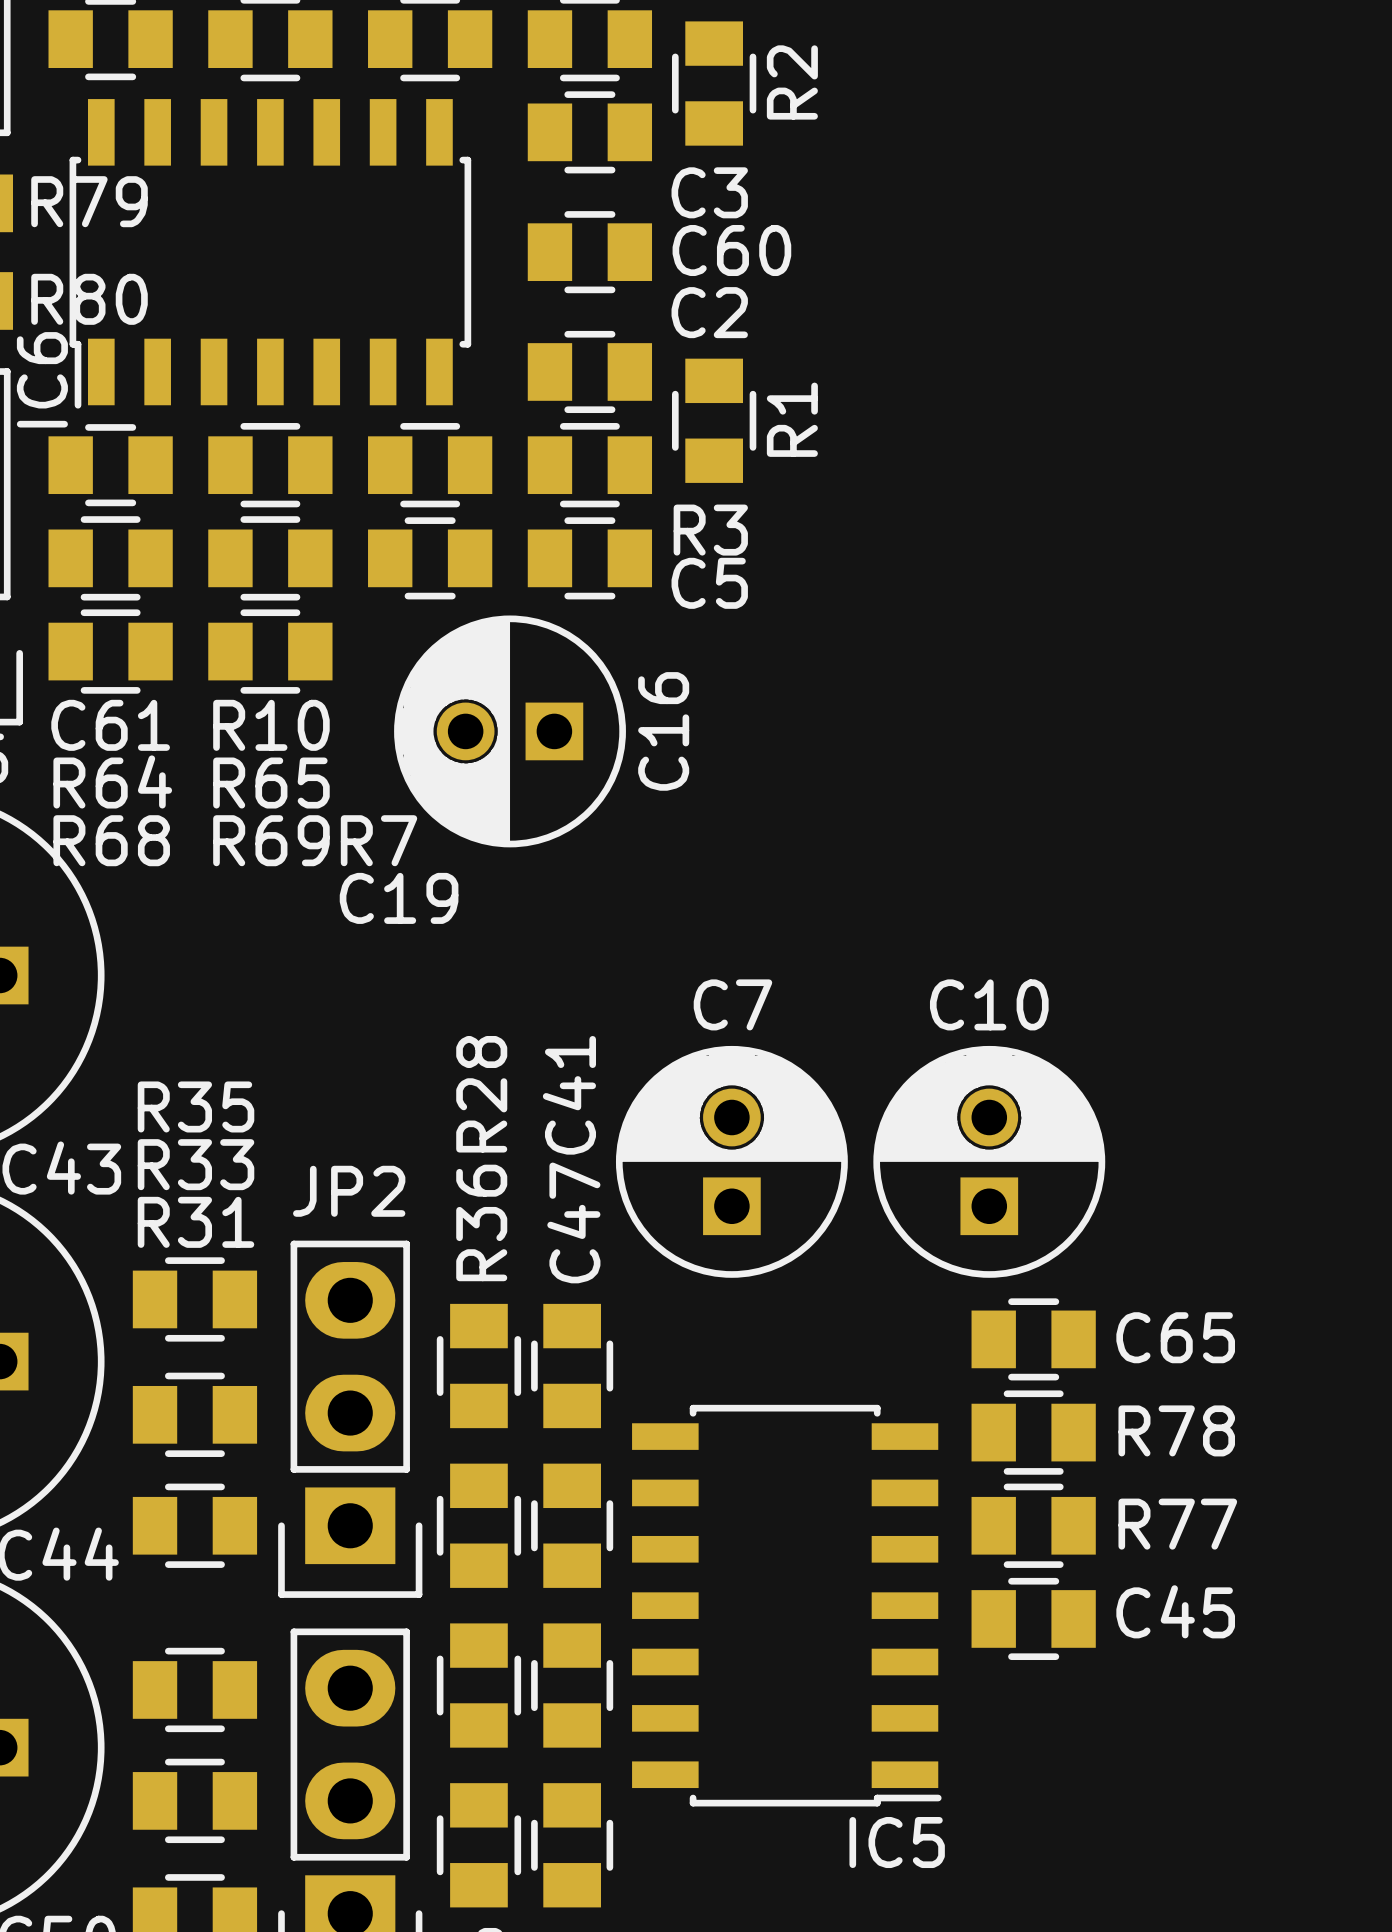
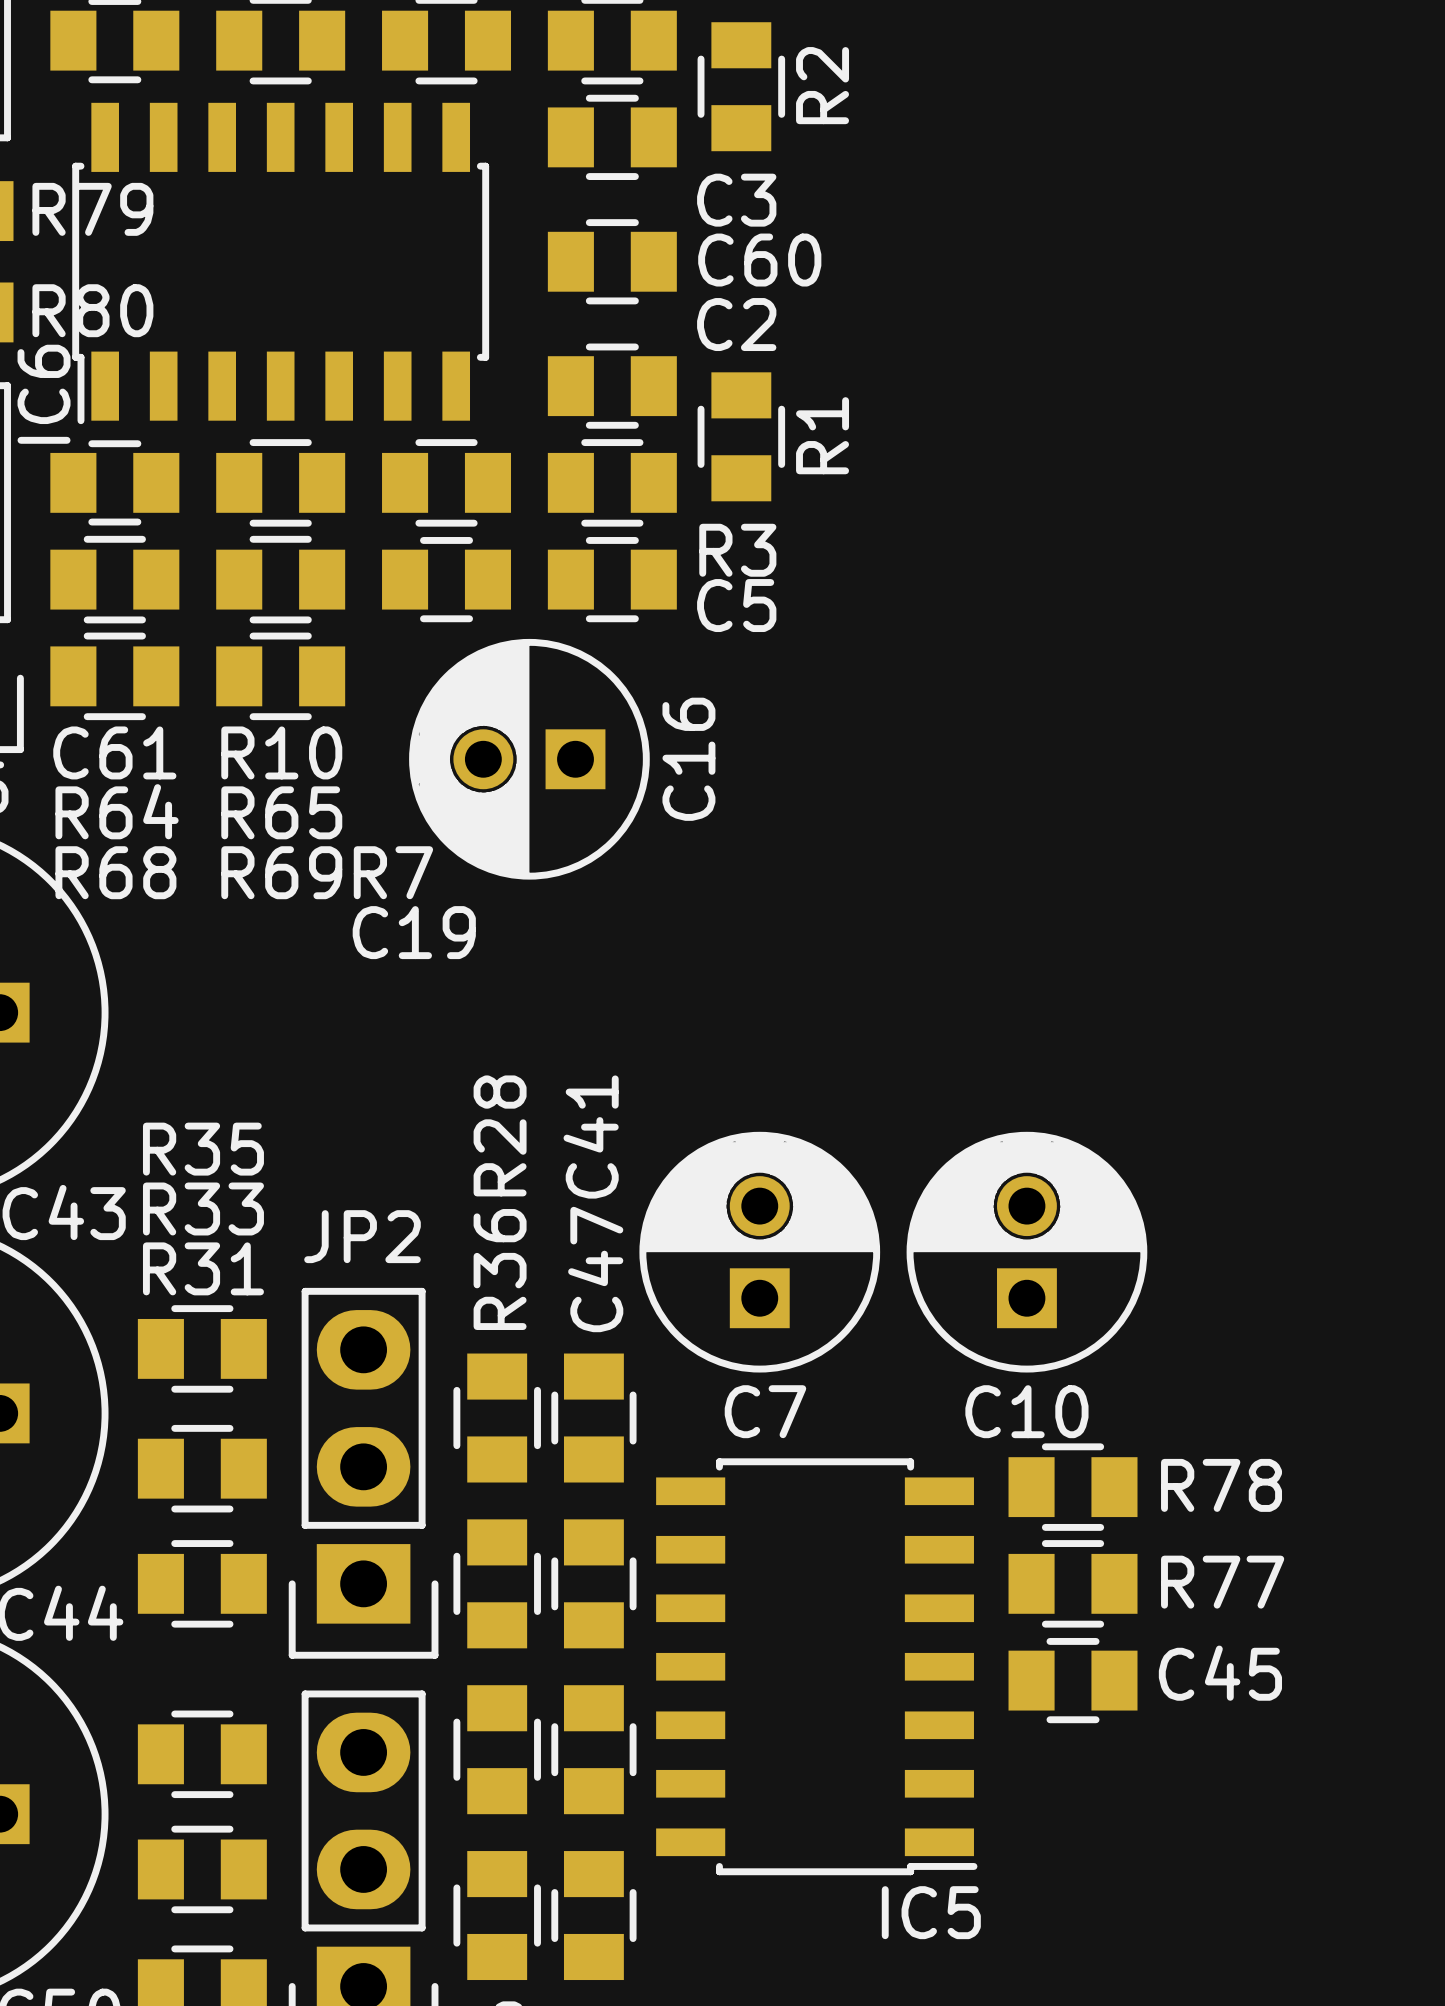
C7 name position: C7 (732, 1004) -> C7 (765, 1411)
C10 name position: C10 (989, 1004) -> C10 (1026, 1411)
C7 position: (731, 1161) -> (759, 1252)
C10 position: (989, 1161) -> (1026, 1252)
C65: (1033, 1339) -> none

